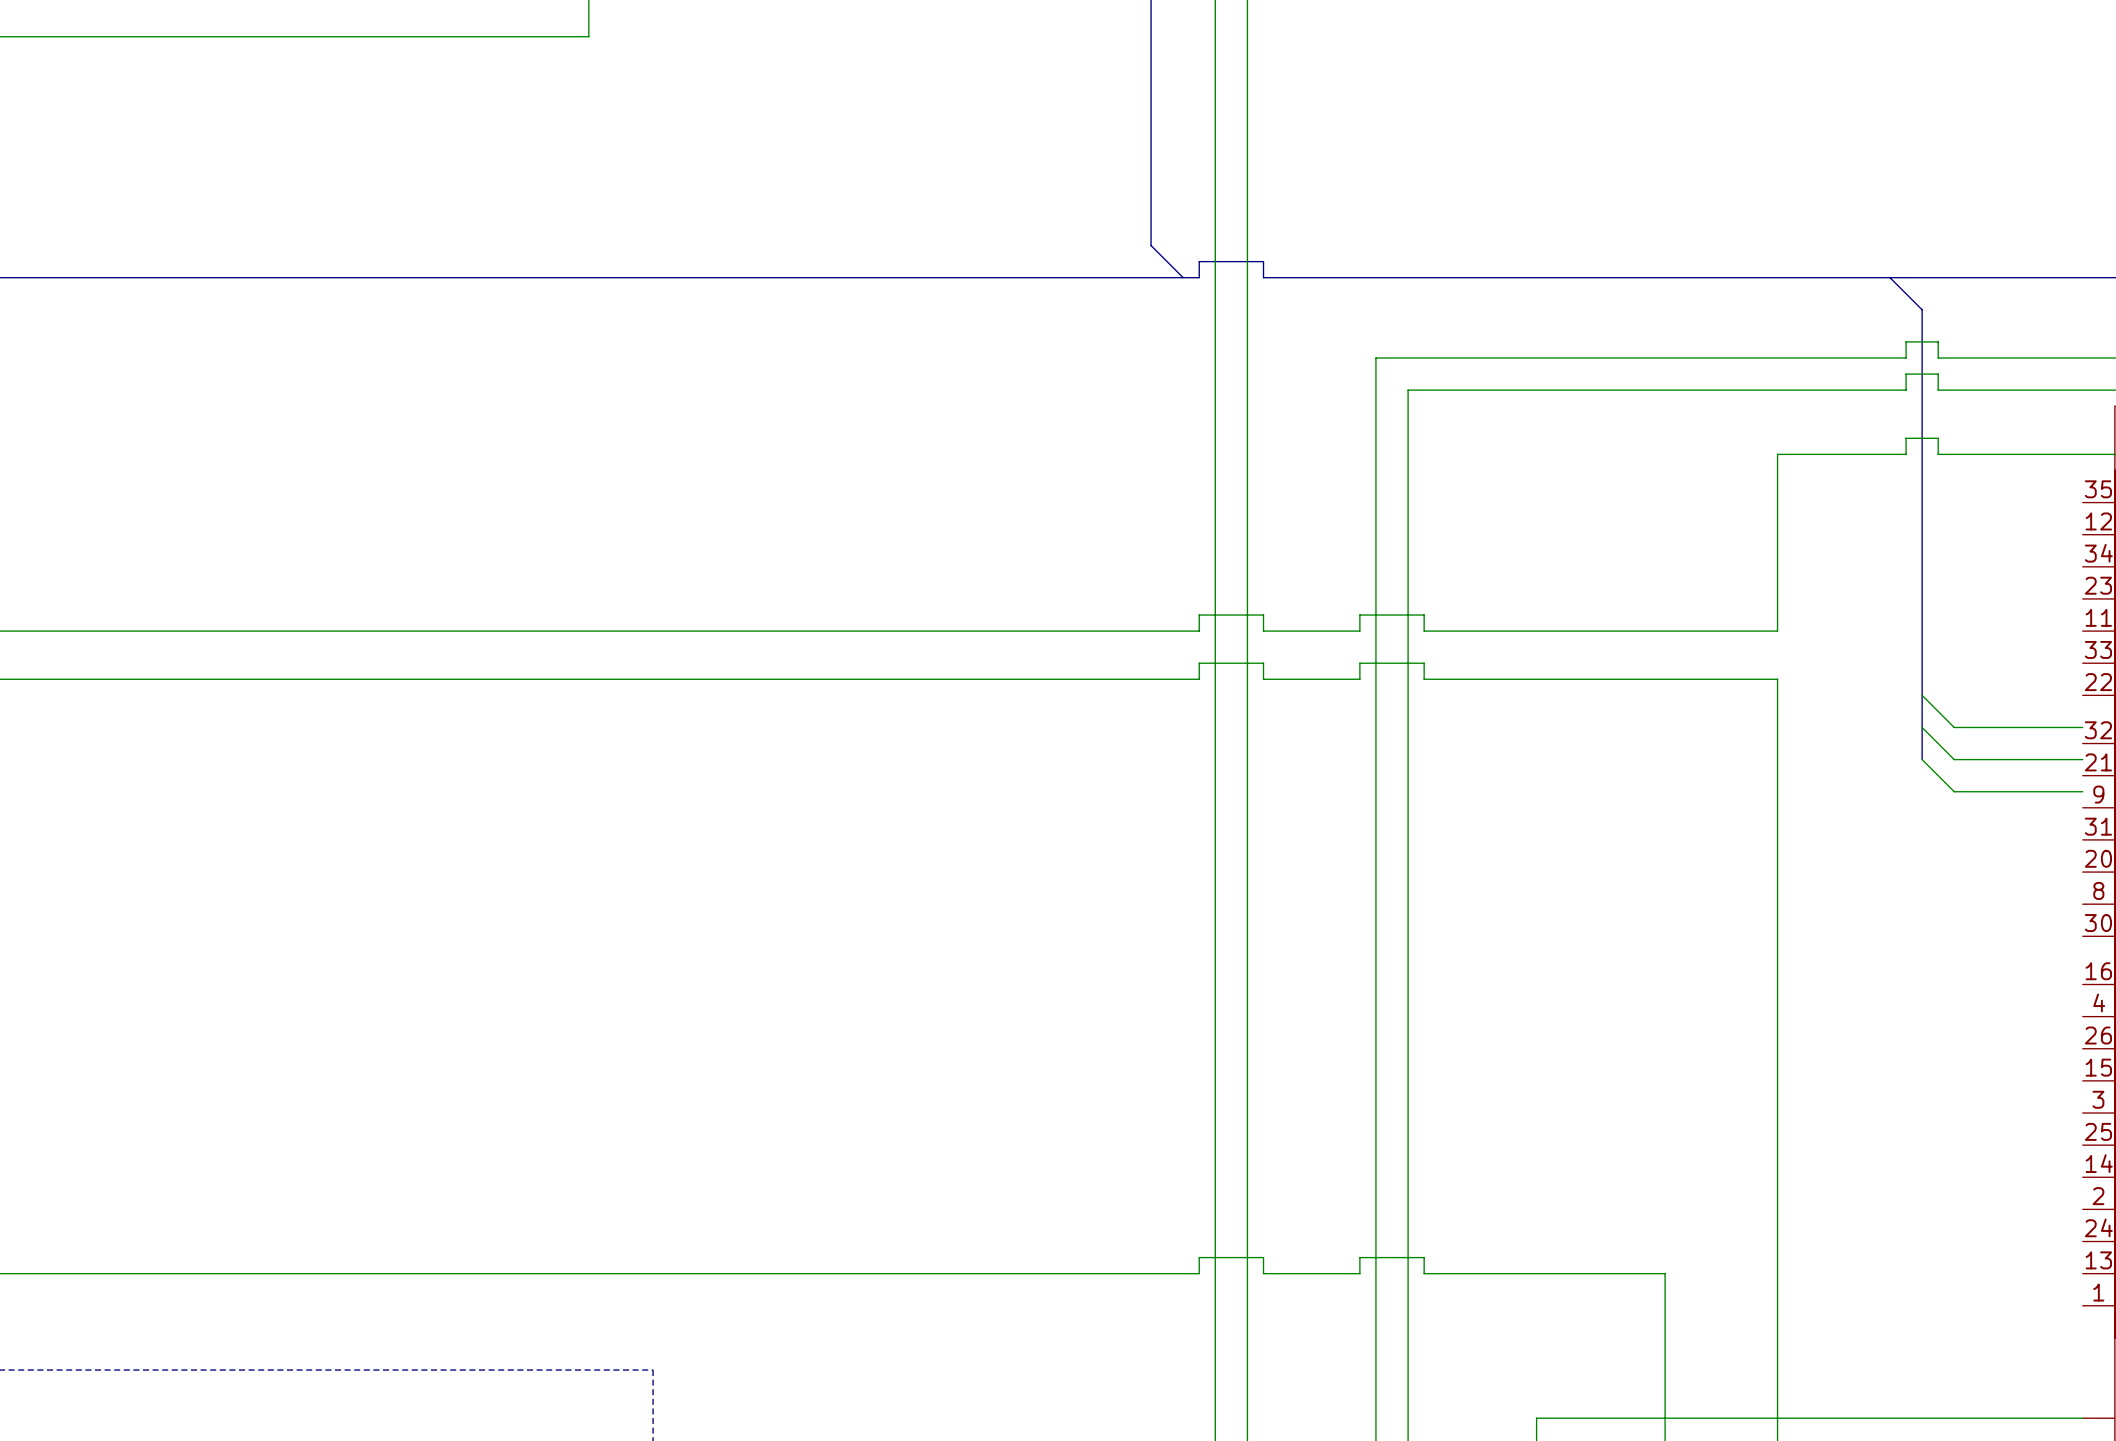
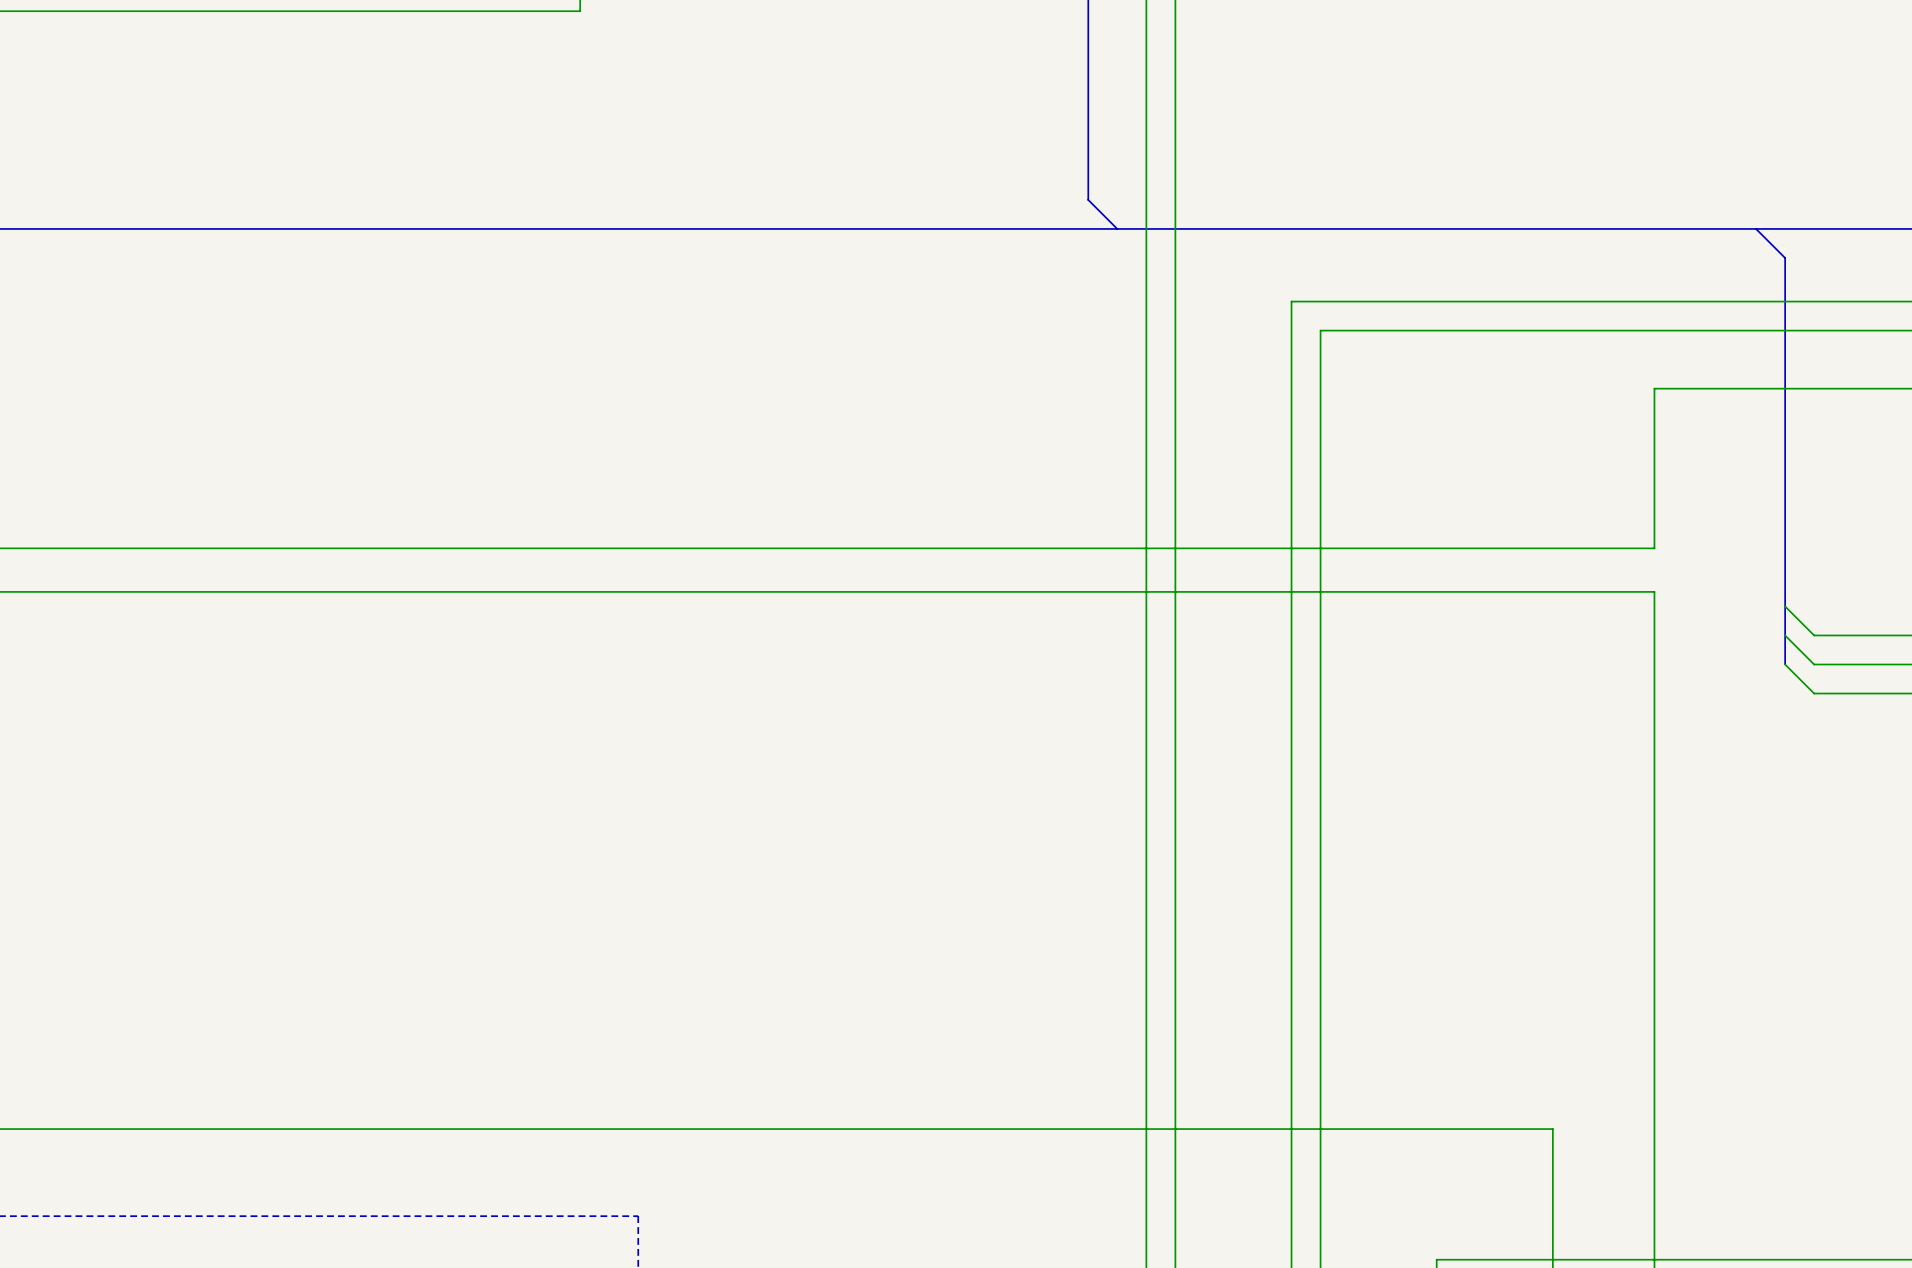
bus: (1199, 277) (1199, 261) (1263, 261) (1263, 277) -> (1131, 228) (1189, 228)
wire: (1906, 358) (1906, 341) (1938, 341) (1938, 358) -> (1770, 301) (1799, 301)
wire: (1906, 390) (1906, 374) (1938, 374) (1938, 390) -> (1770, 330) (1799, 330)
wire: (1906, 454) (1906, 438) (1938, 438) (1938, 454) -> (1770, 388) (1799, 388)
wire: (1199, 631) (1199, 615) (1263, 615) (1263, 631) -> (1131, 548) (1189, 548)
wire: (1359, 631) (1359, 615) (1424, 615) (1424, 631) -> (1277, 548) (1335, 548)
wire: (1199, 679) (1199, 663) (1263, 663) (1263, 679) -> (1131, 591) (1189, 591)
wire: (1359, 679) (1359, 663) (1424, 663) (1424, 679) -> (1277, 591) (1335, 591)
wire: (1199, 1273) (1199, 1257) (1263, 1257) (1263, 1273) -> (1131, 1129) (1189, 1129)
wire: (1359, 1273) (1359, 1257) (1424, 1257) (1424, 1273) -> (1277, 1129) (1335, 1129)

